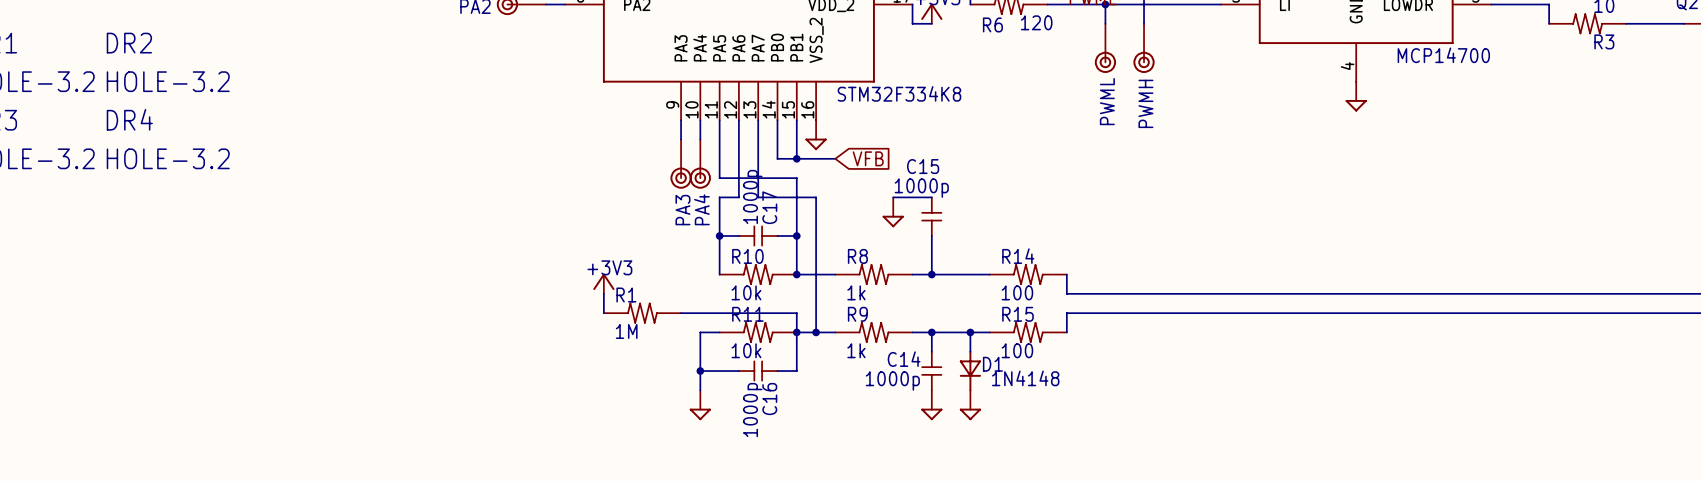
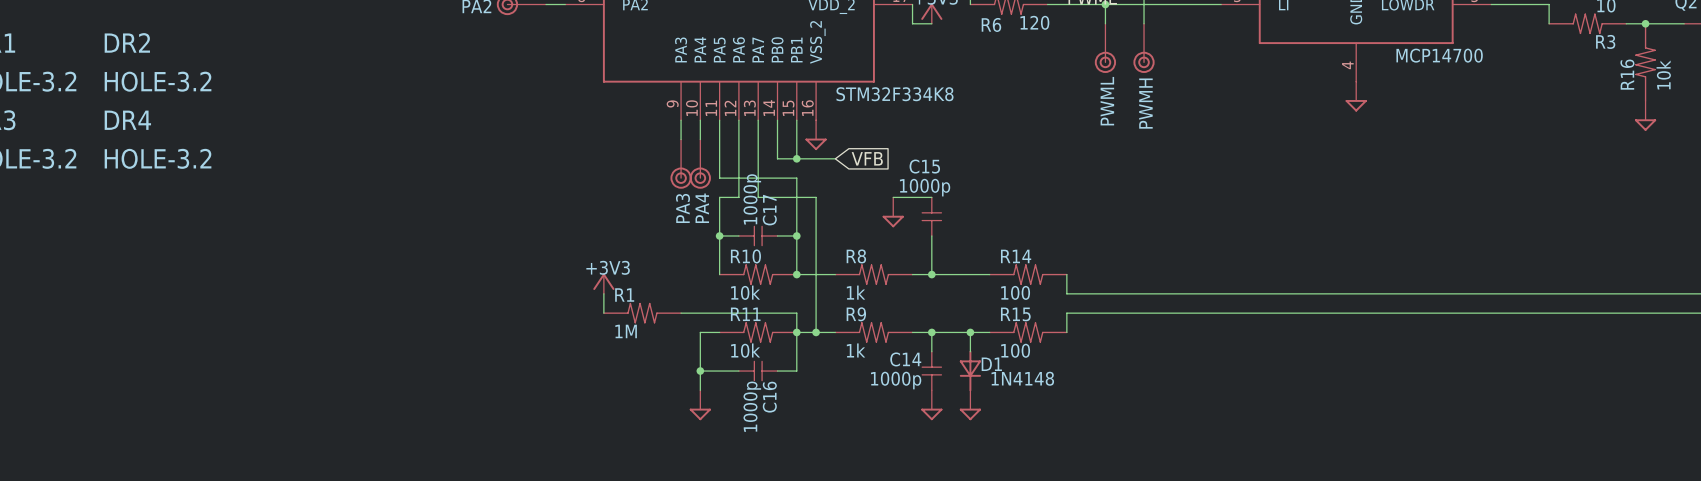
junction: none -> (1645, 23)
R16: none -> 10k (1645, 62)
power symbol: none -> (1645, 115)

